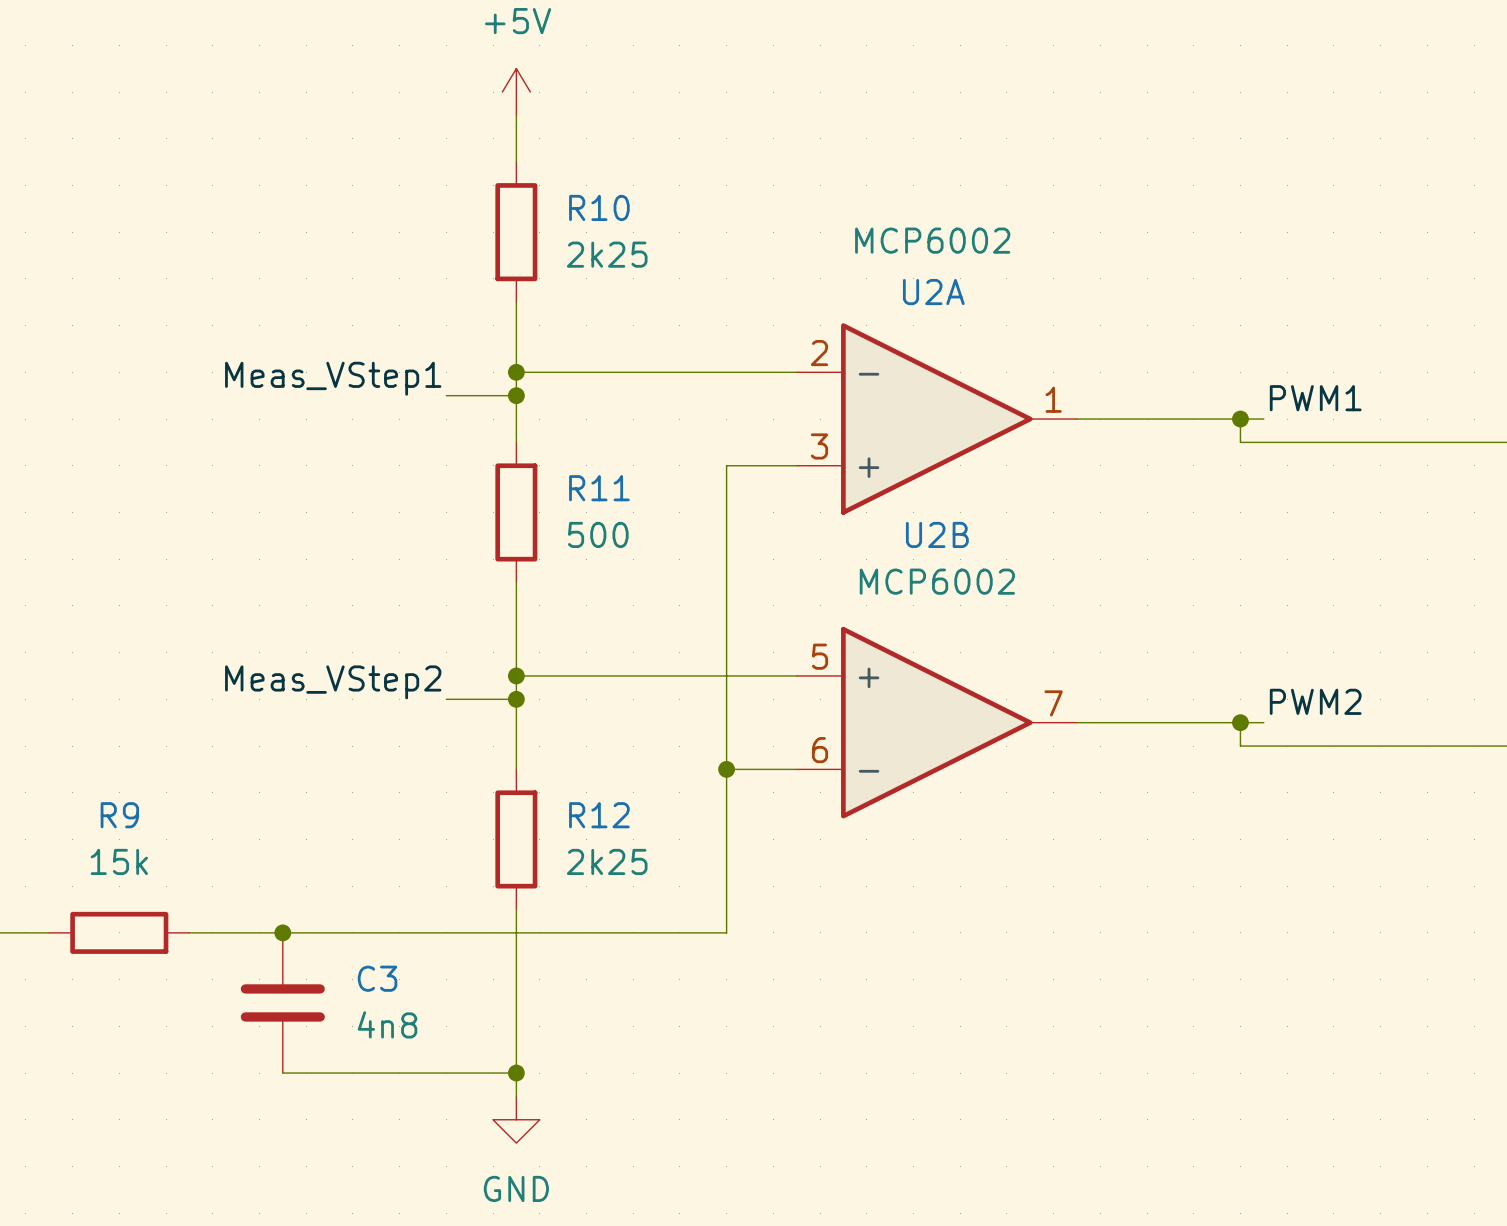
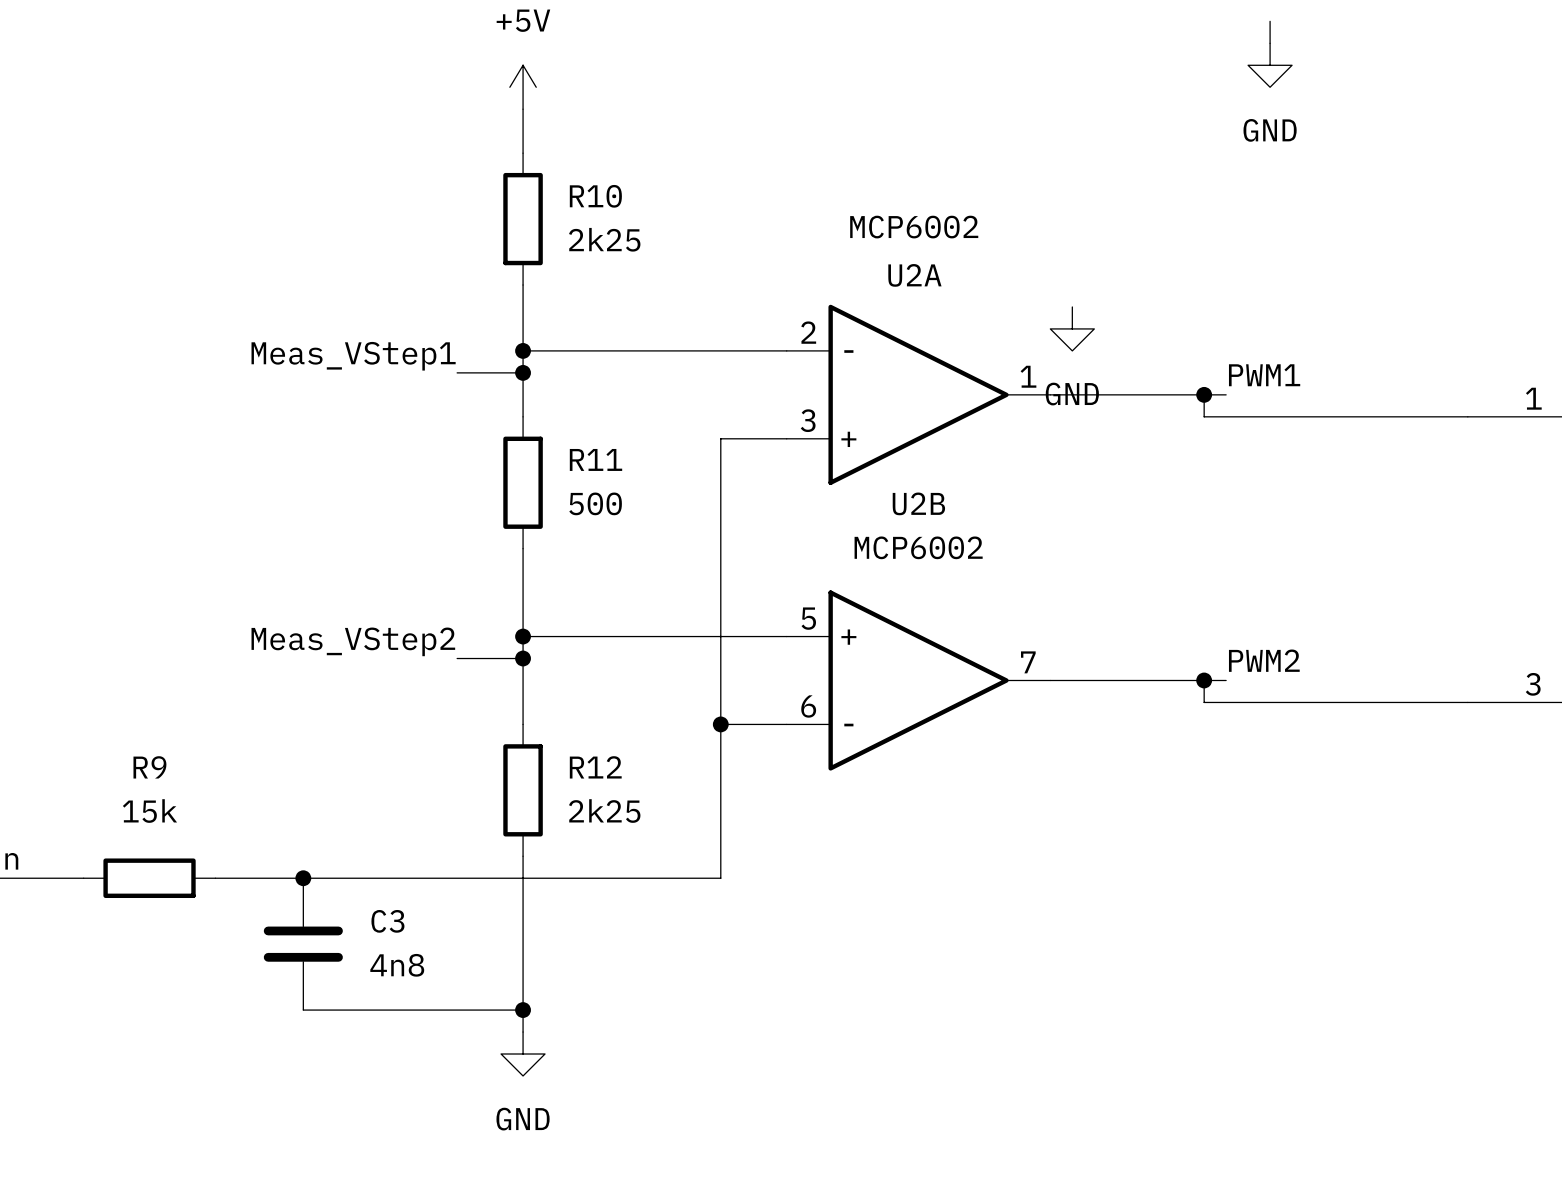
wire: none -> (1270, 21) (1270, 43)
power symbol: none -> GND (1270, 65)
power symbol: none -> GND (1072, 328)

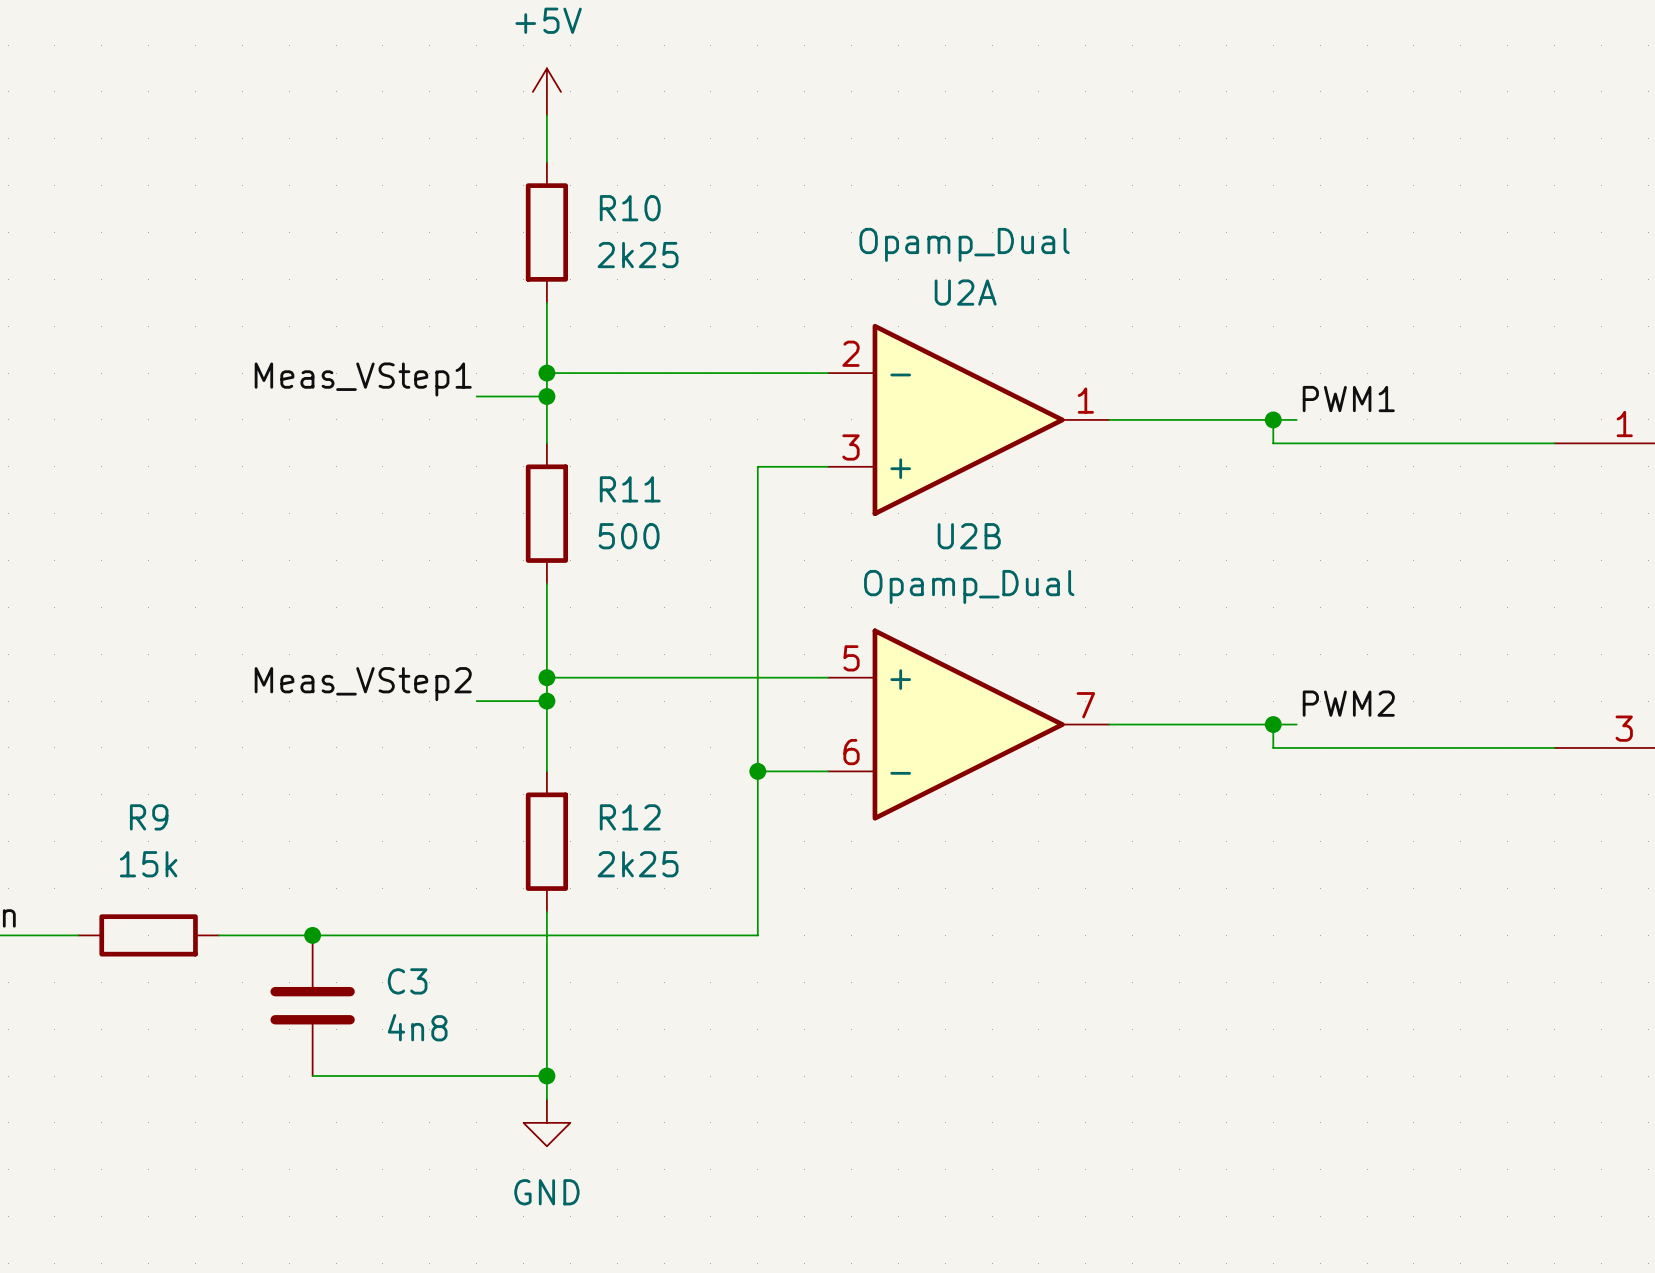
wire: (1270, 21) (1270, 43) -> none
power symbol: GND (1270, 65) -> none
U2A value: MCP6002 (914, 227) -> Opamp_Dual (964, 244)
power symbol: GND (1072, 328) -> none
U2B value: MCP6002 (918, 547) -> Opamp_Dual (969, 586)

